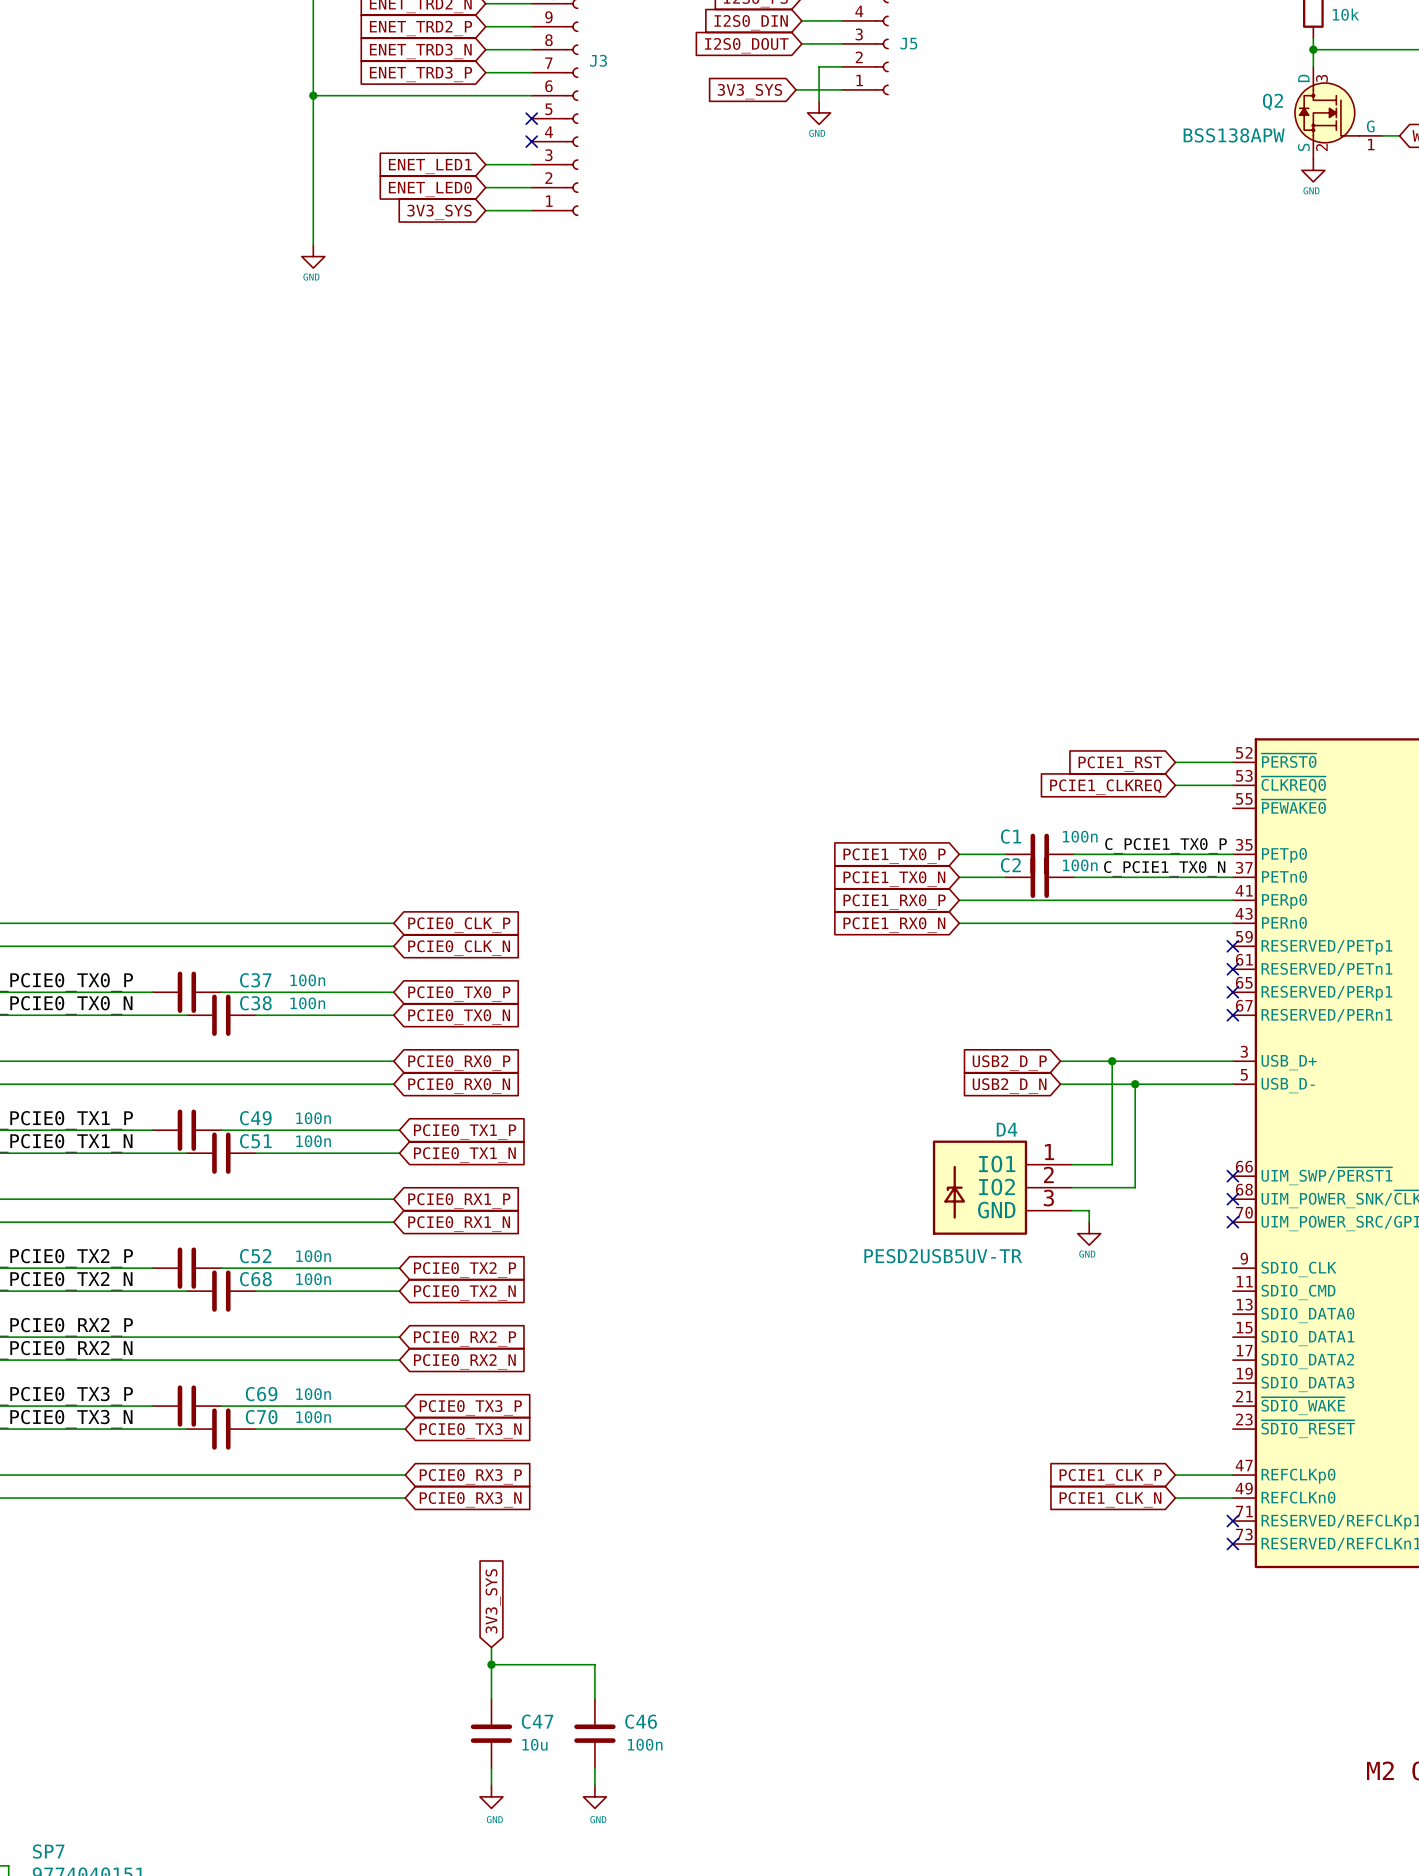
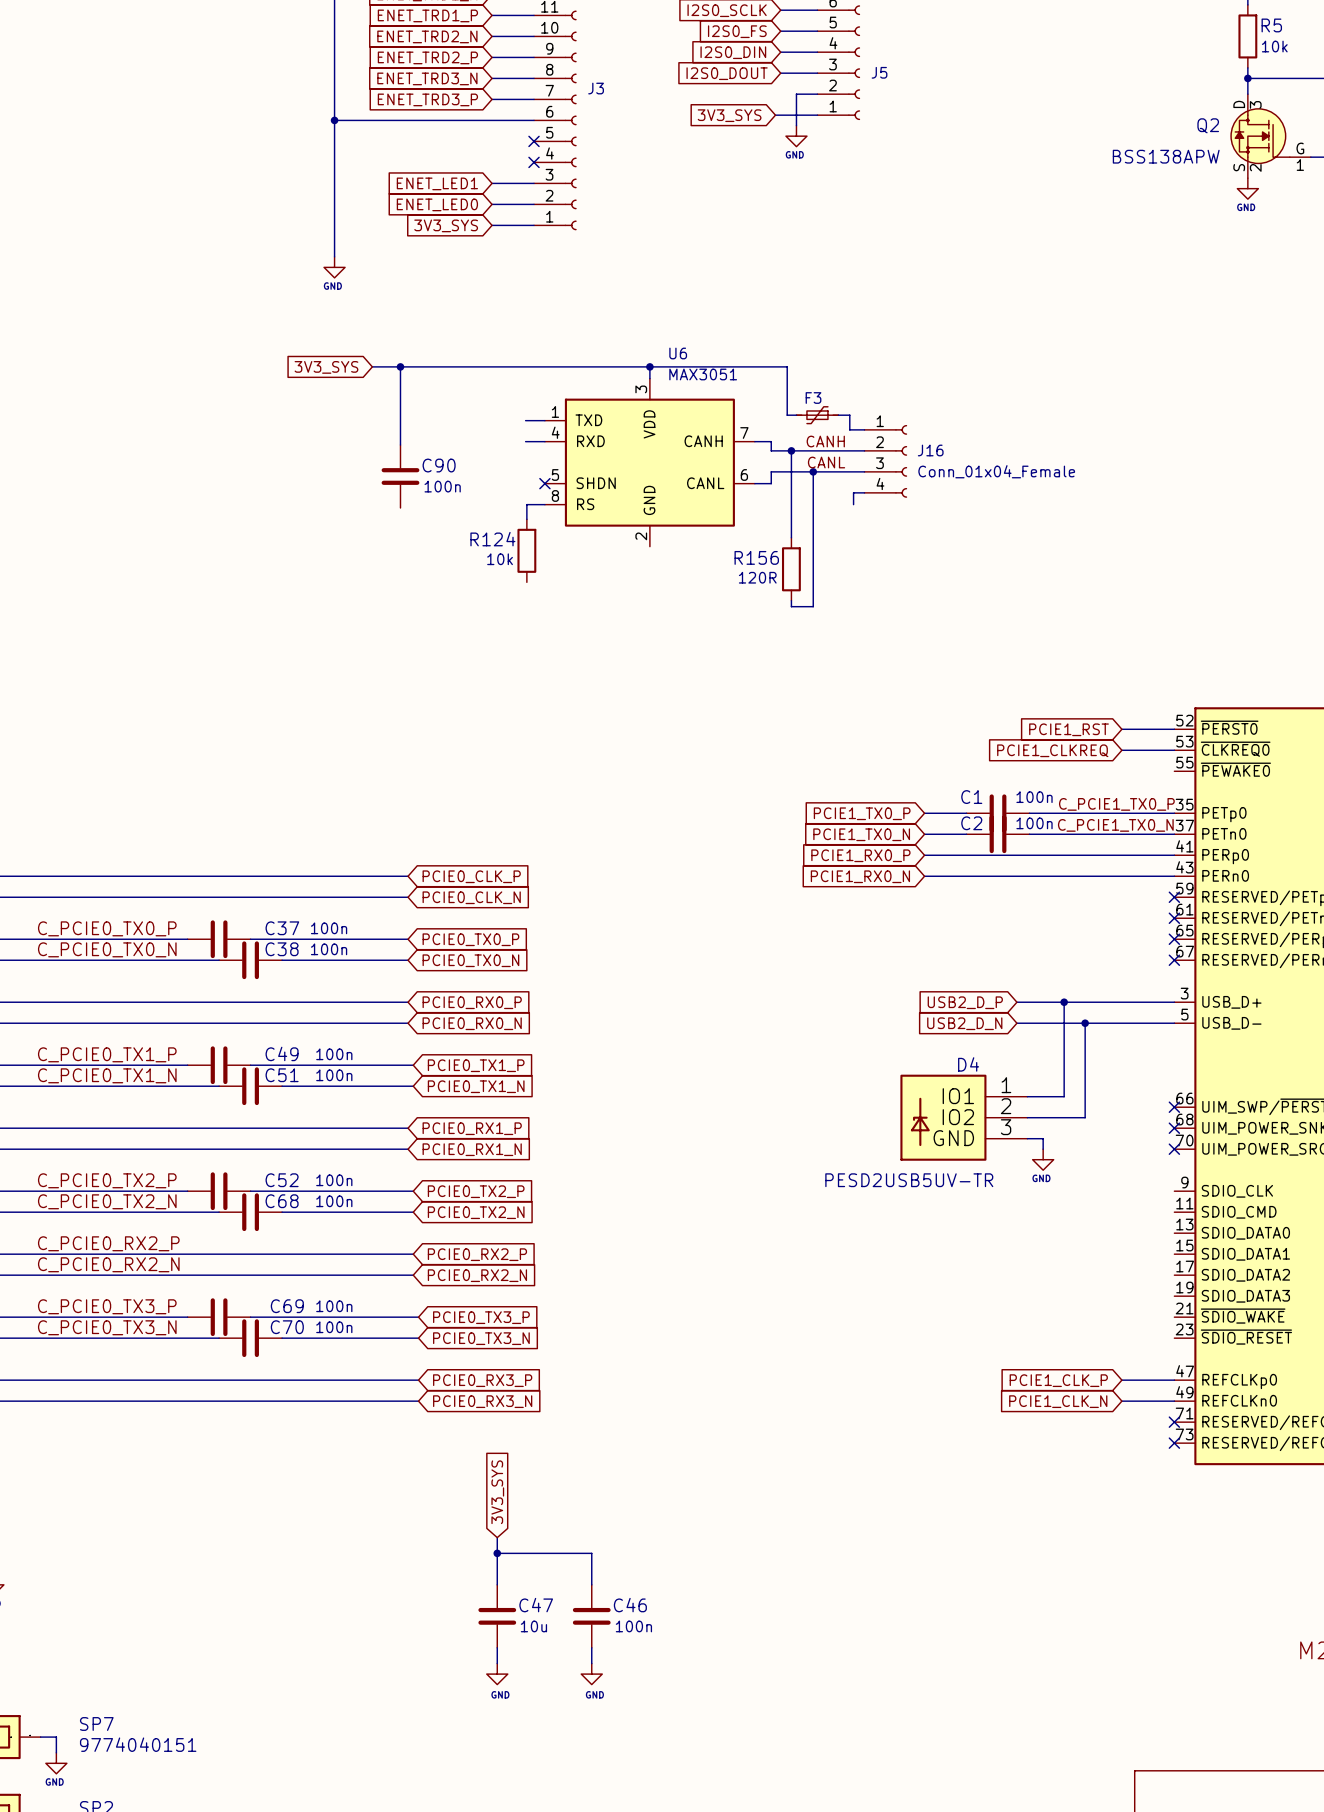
wire: none -> (372, 366) (787, 366) (787, 415) (796, 415)
wire: none -> (400, 366) (400, 445)
junction: none -> (400, 366)
wire: none -> (649, 366) (649, 378)
junction: none -> (649, 366)
global label: none -> 3V3_SYS (326, 367)
F3: none -> (817, 415)
wire: none -> (838, 415) (849, 415) (849, 429) (864, 429)
wire: none -> (525, 420) (544, 420)
wire: none -> (525, 441) (544, 441)
wire: none -> (754, 441) (771, 441) (771, 450) (864, 450)
label: none -> CANH (825, 441)
wire: none -> (791, 450) (791, 537)
junction: none -> (791, 450)
J16: none -> Conn_01x04_Female (885, 461)
U6: none -> MAX3051 (649, 462)
label: none -> CANL (826, 462)
wire: none -> (813, 471) (813, 606) (791, 606) (791, 600)
junction: none -> (813, 471)
wire: none -> (864, 471) (771, 471) (771, 483) (754, 483)
C90: none -> (400, 476)
no-connect mark: none -> (544, 483)
wire: none -> (864, 492) (853, 492) (853, 504)
wire: none -> (544, 504) (526, 504) (526, 519)
R124: none -> (526, 550)
R156: none -> (791, 569)

